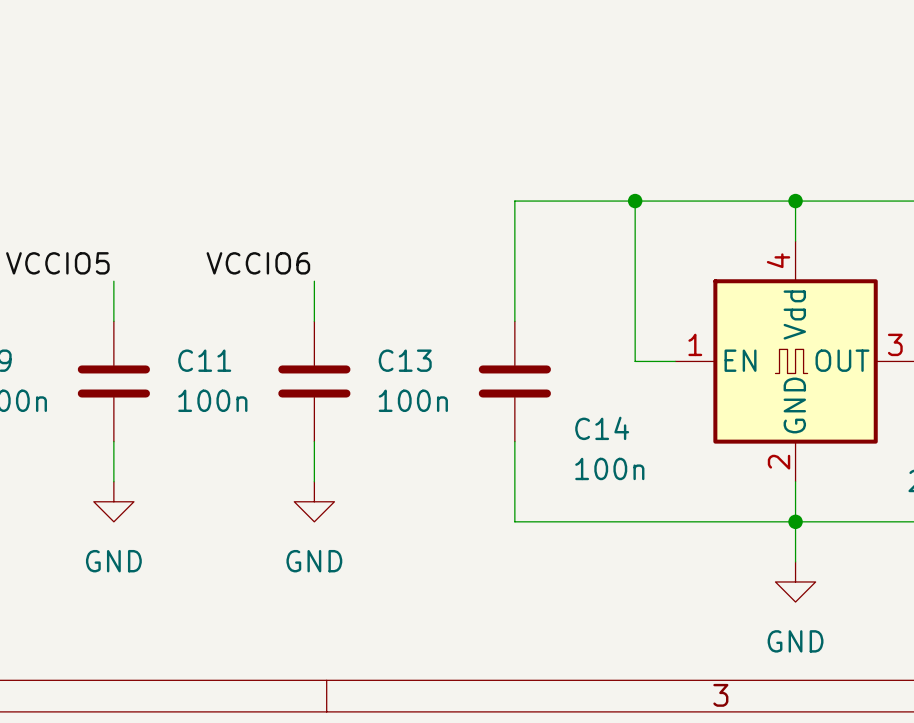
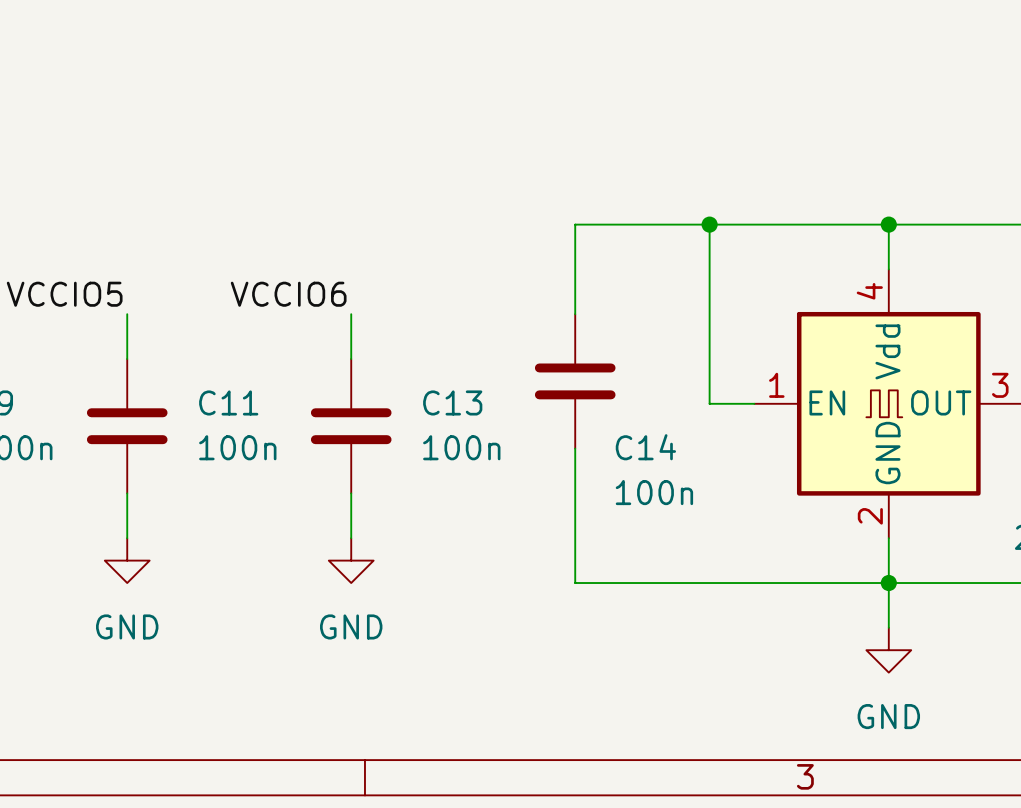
C14 position: (514, 381) -> (575, 381)
C14 name position: C14 (602, 428) -> C14 (645, 447)
C14 value position: 100n (609, 468) -> 100n (654, 492)

